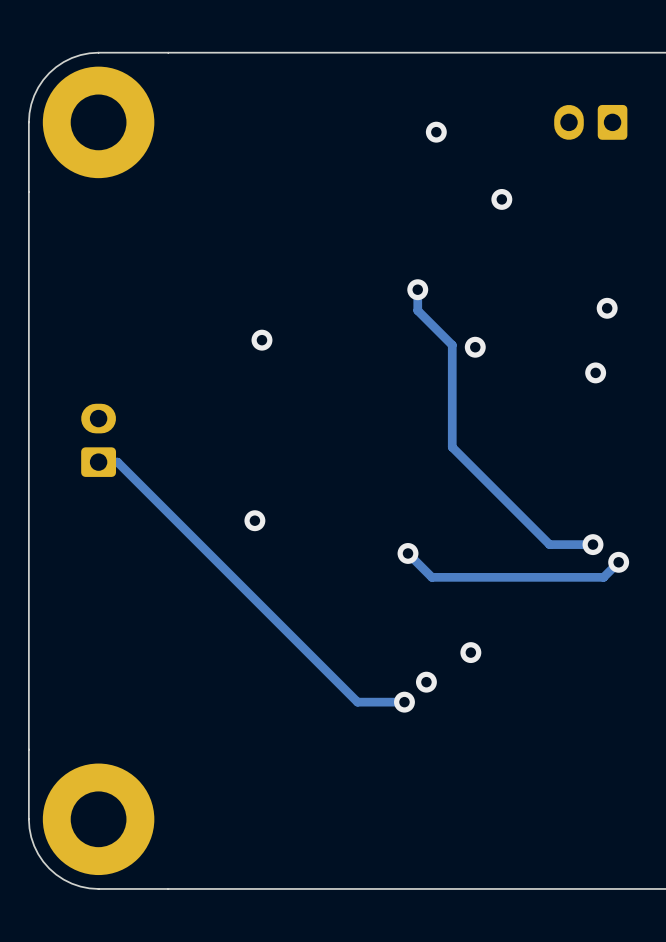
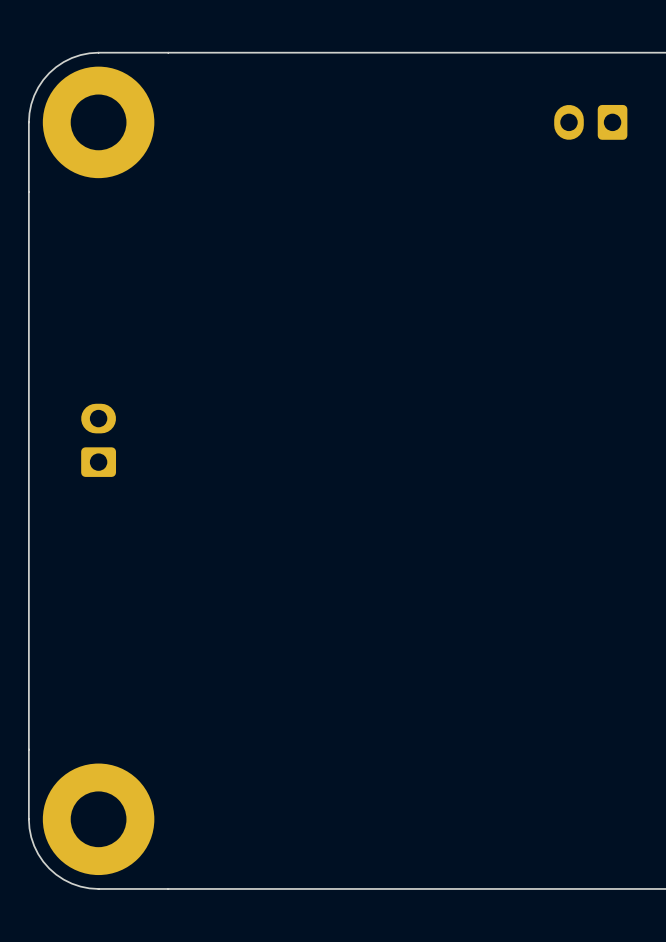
via: (436, 132) -> none
via: (501, 199) -> none
track: (417, 289) (417, 310) (452, 345) (452, 447) (549, 544) (592, 544) -> none
via: (417, 289) -> none
via: (607, 308) -> none
via: (261, 340) -> none
via: (475, 347) -> none
via: (595, 372) -> none
track: (98, 462) (117, 462) (357, 702) (404, 702) -> none
via: (254, 520) -> none
via: (592, 544) -> none
track: (408, 553) (431, 577) (603, 577) (618, 562) -> none
via: (408, 553) -> none
via: (618, 562) -> none
via: (470, 652) -> none
via: (426, 682) -> none
via: (404, 702) -> none

